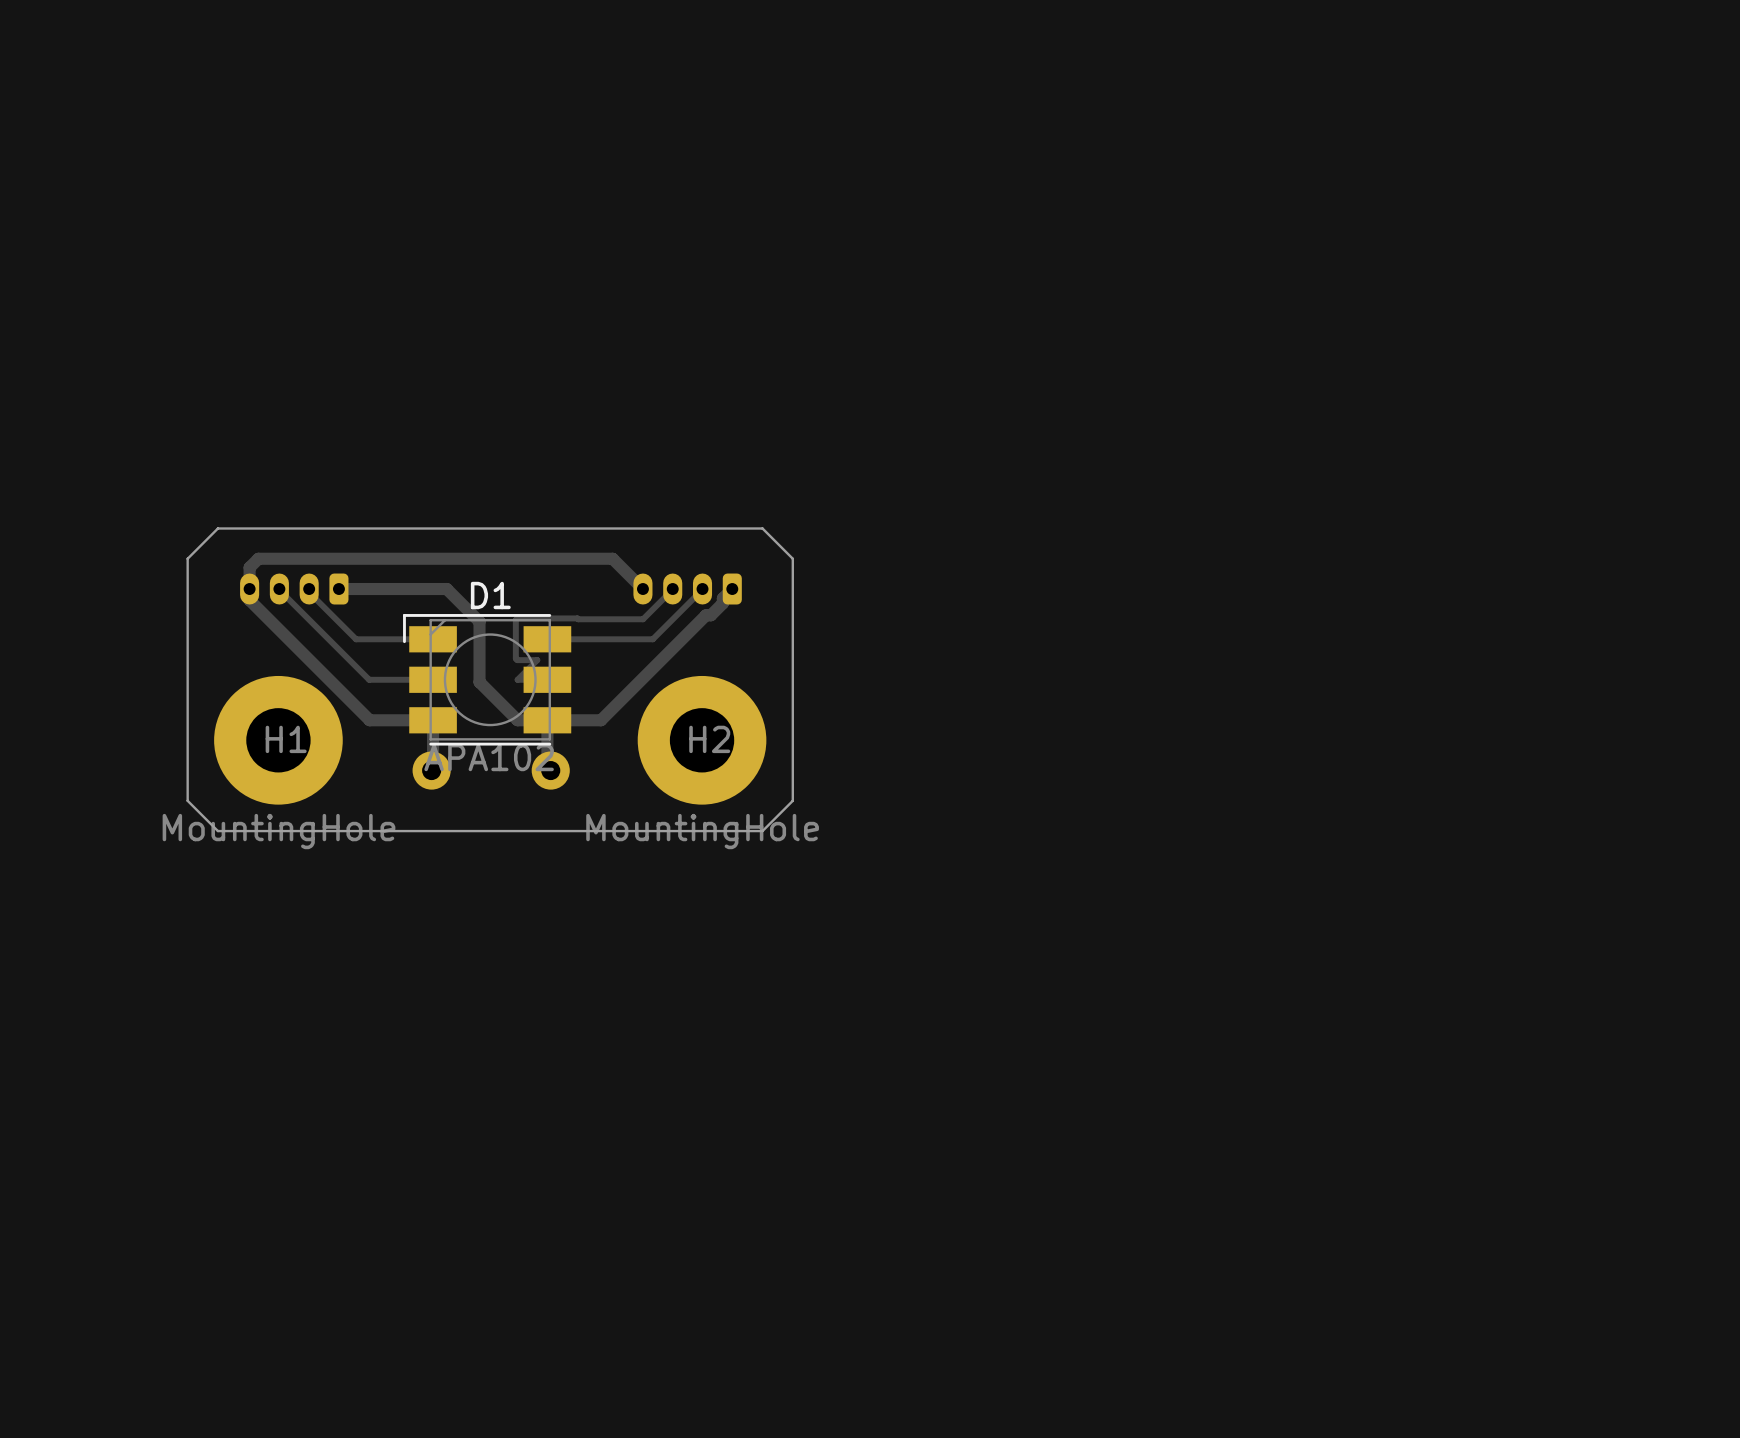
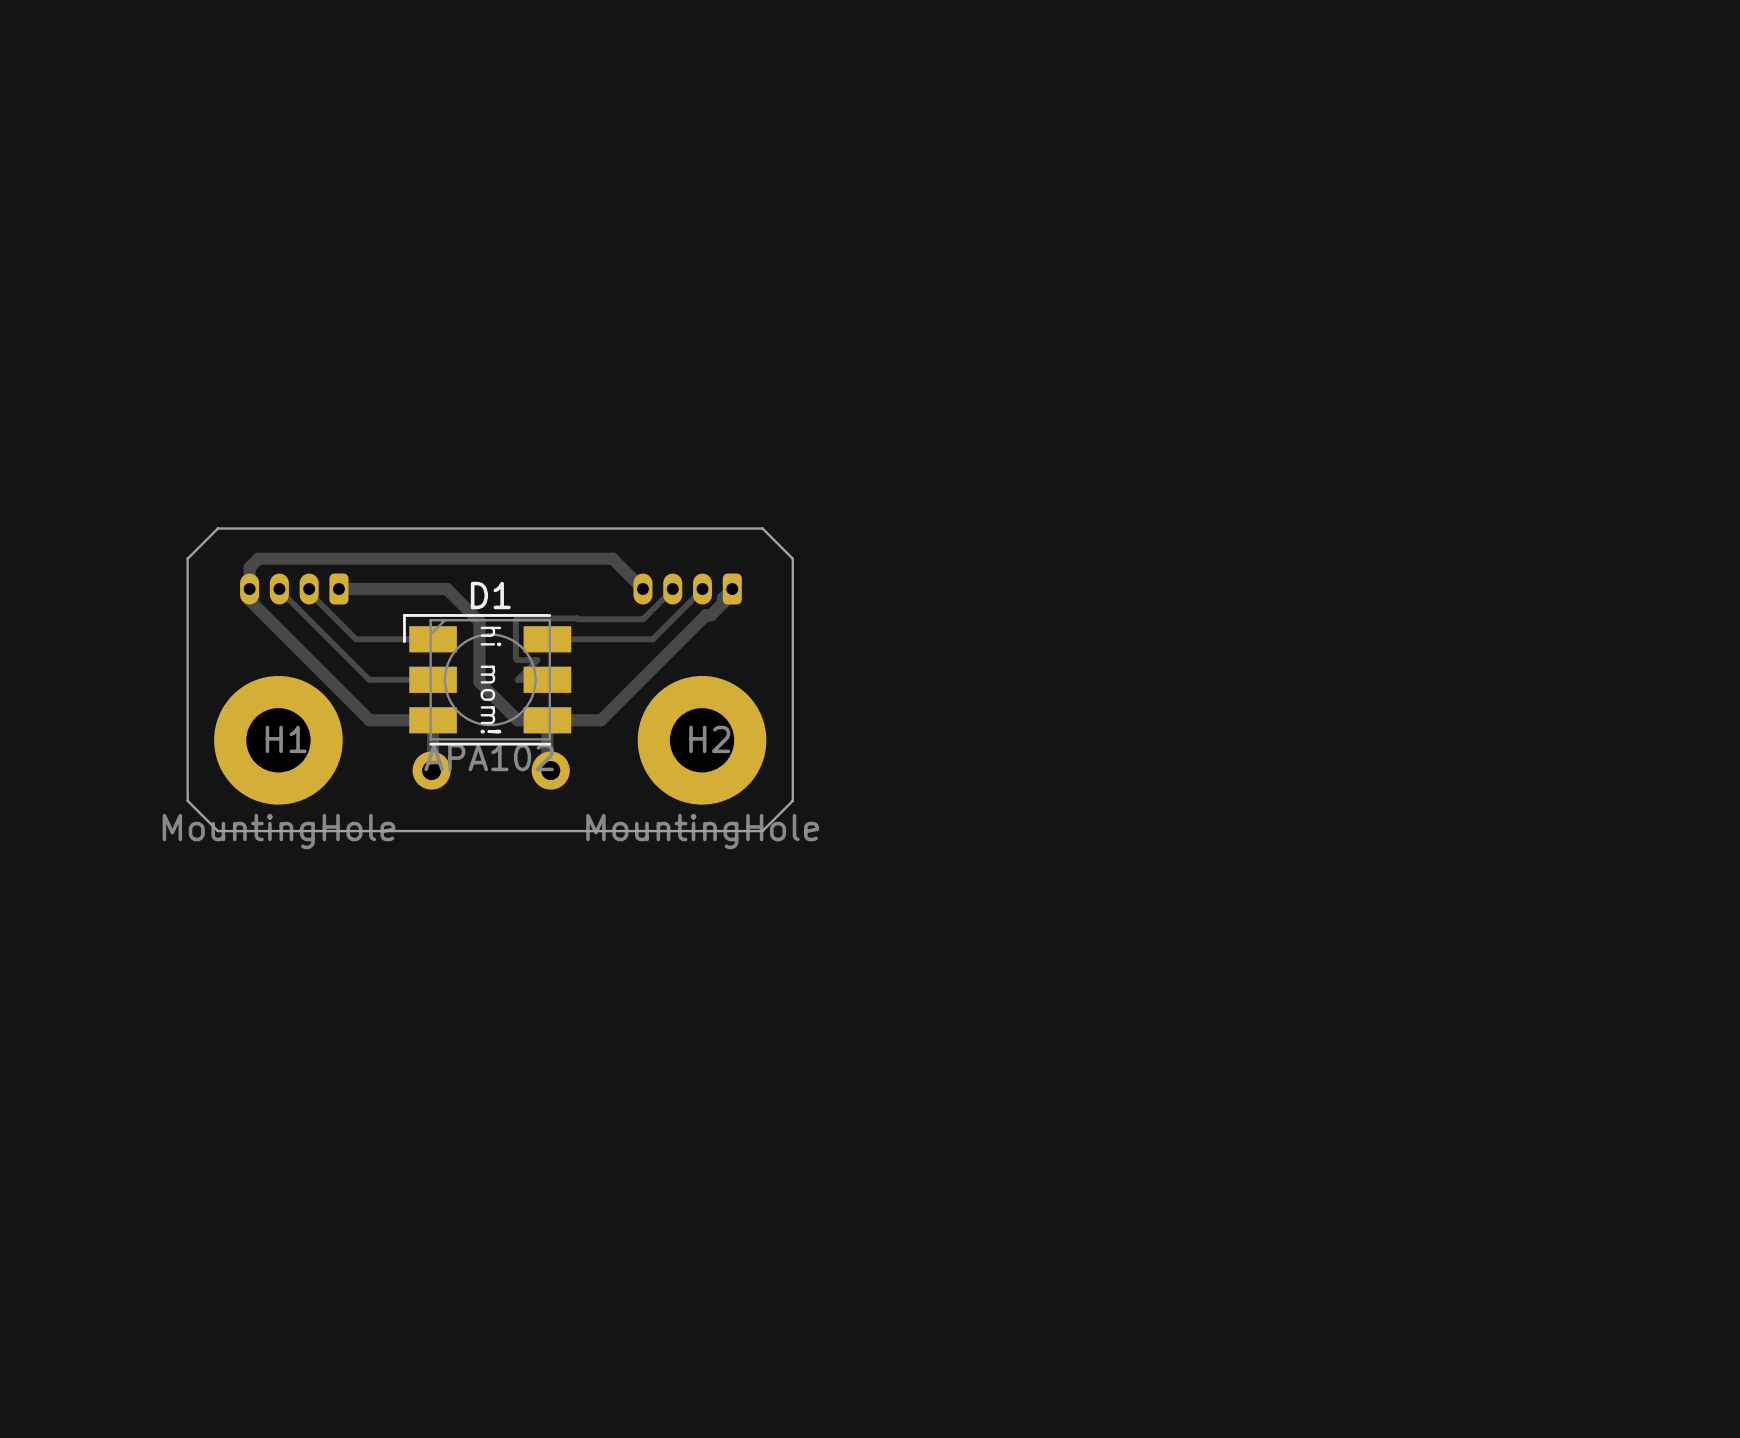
text: none -> hi mom! (490, 680)

